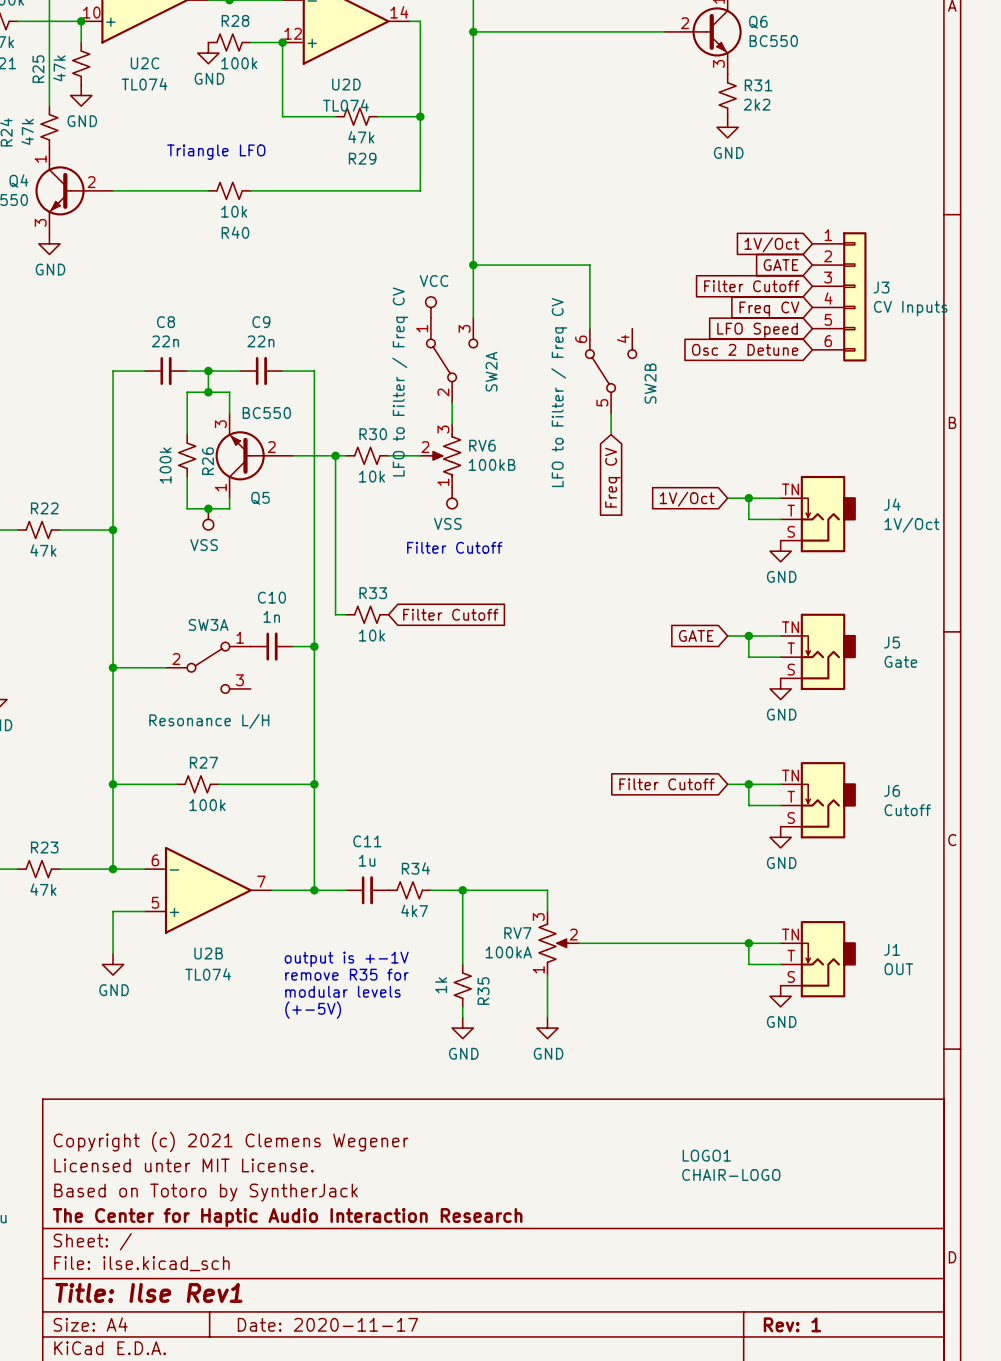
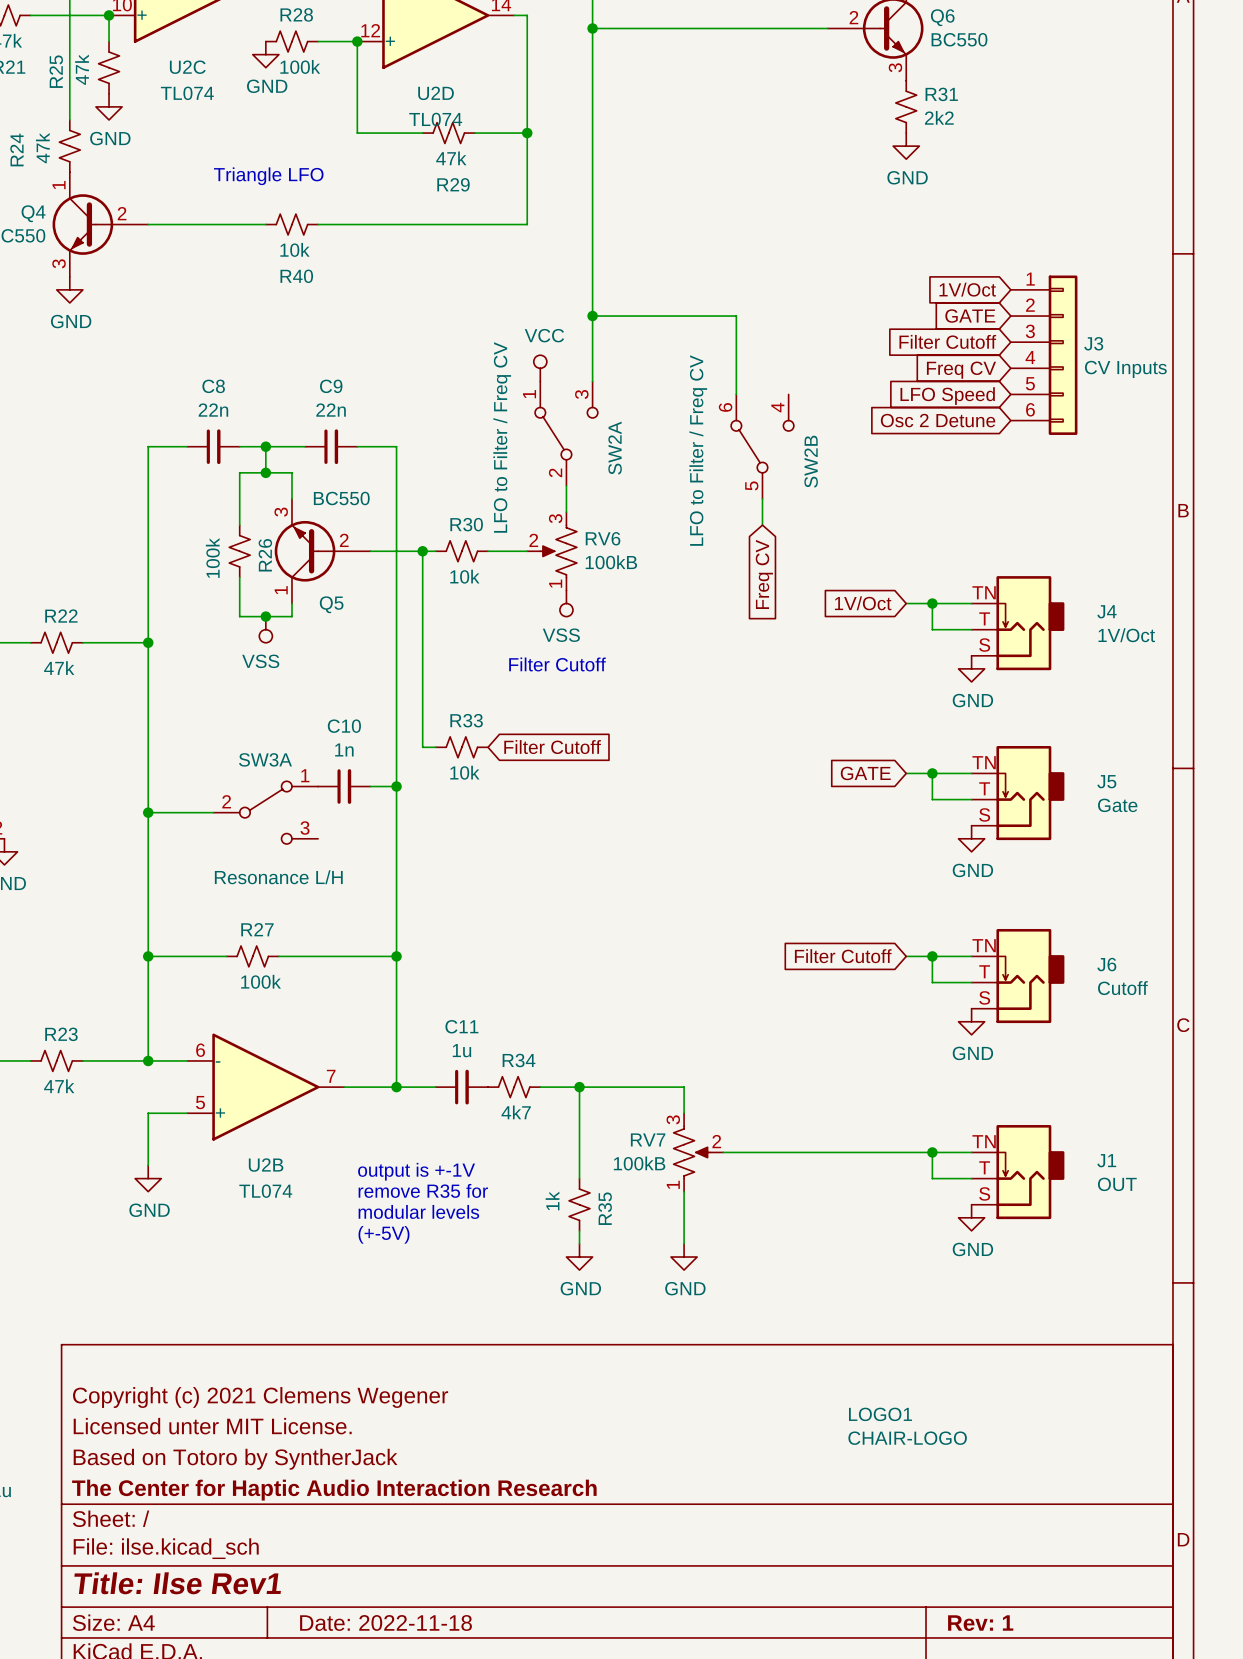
RV7 value: 100kA (508, 952) -> 100kB (639, 1163)
title block: Date: 2020-11-17 (327, 1324) -> Date: 2022-11-18 (386, 1622)

